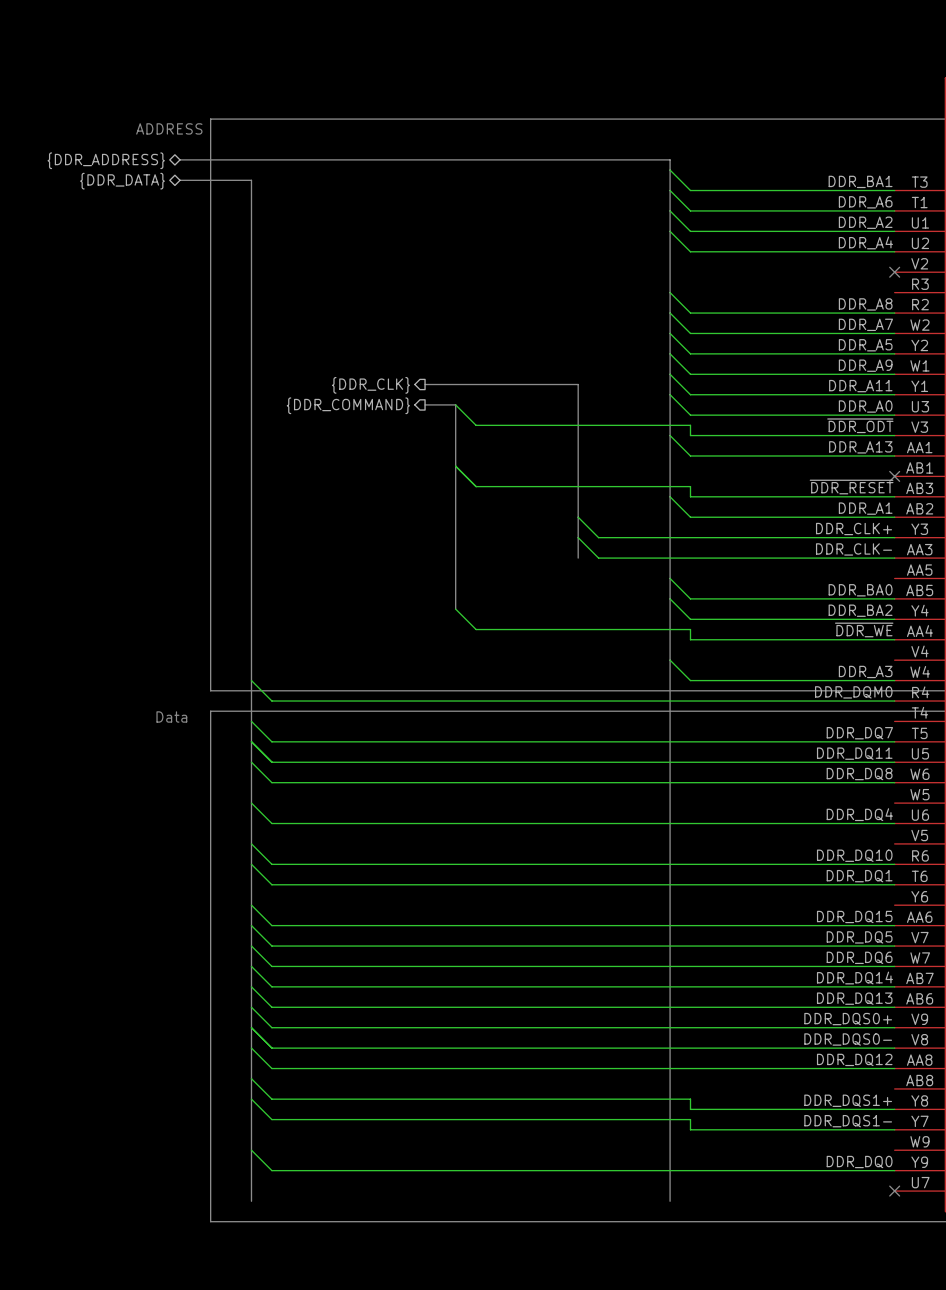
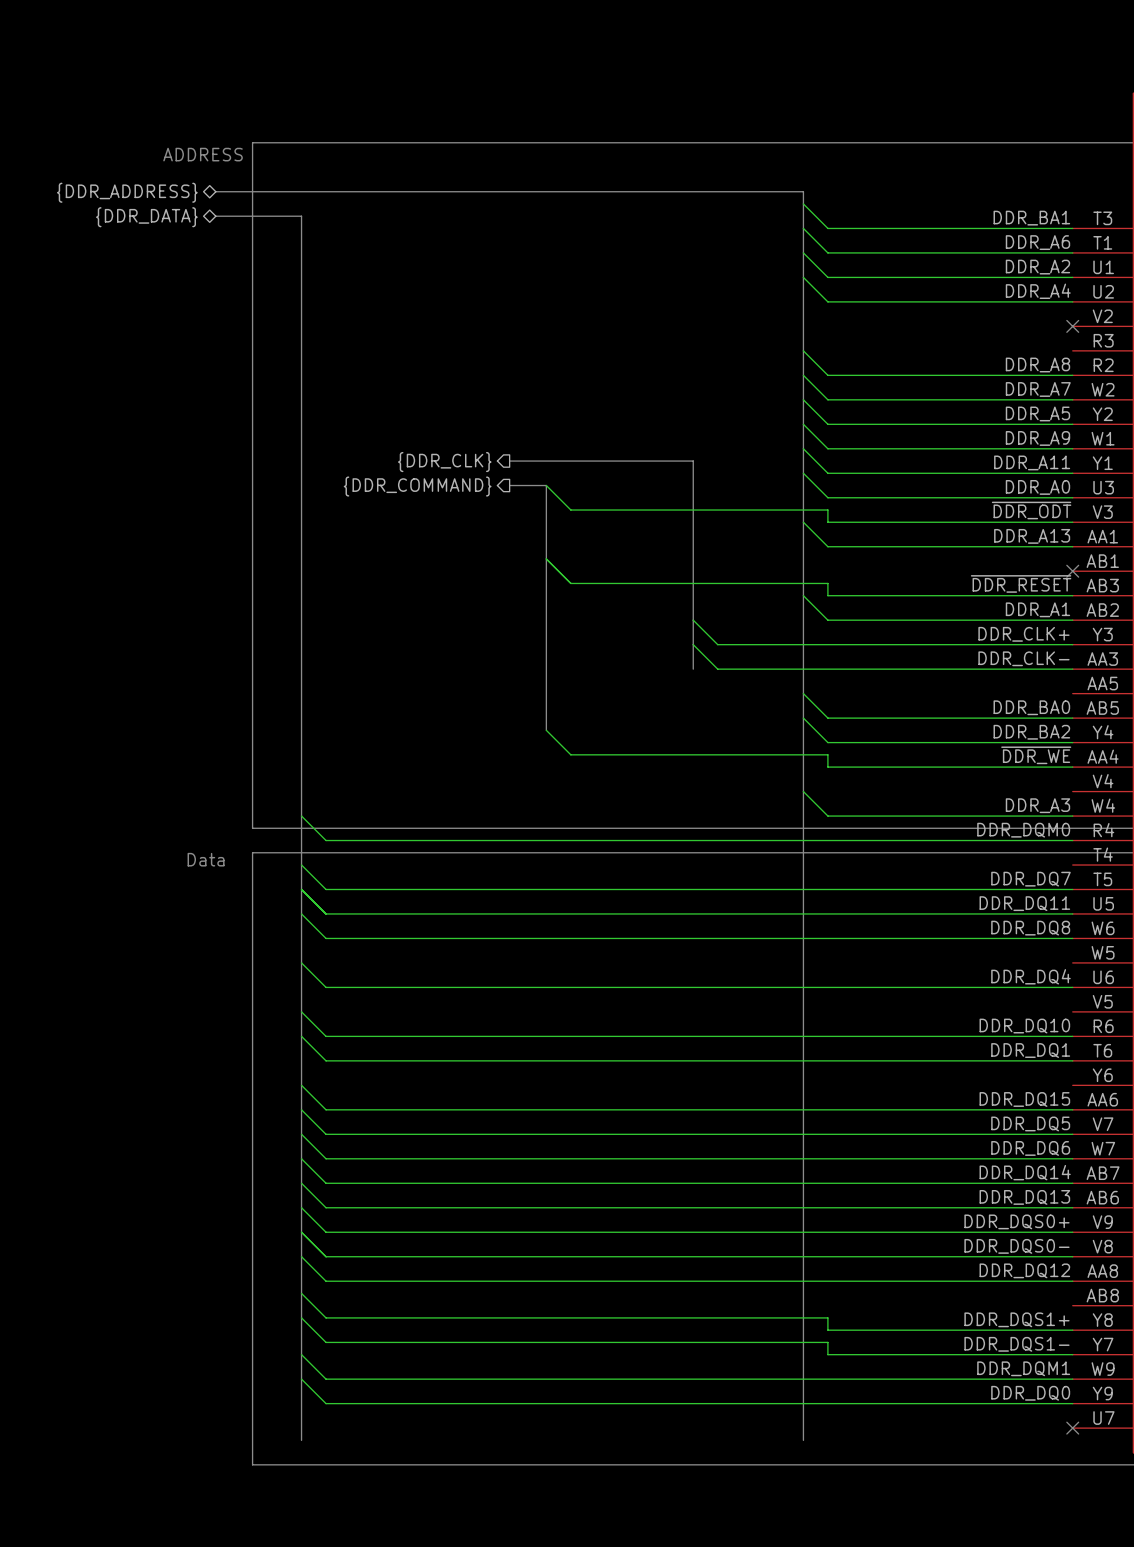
wire: none -> (301, 1354) (326, 1379) (1072, 1379)
label: none -> DDR_DQM1 (1023, 1368)

